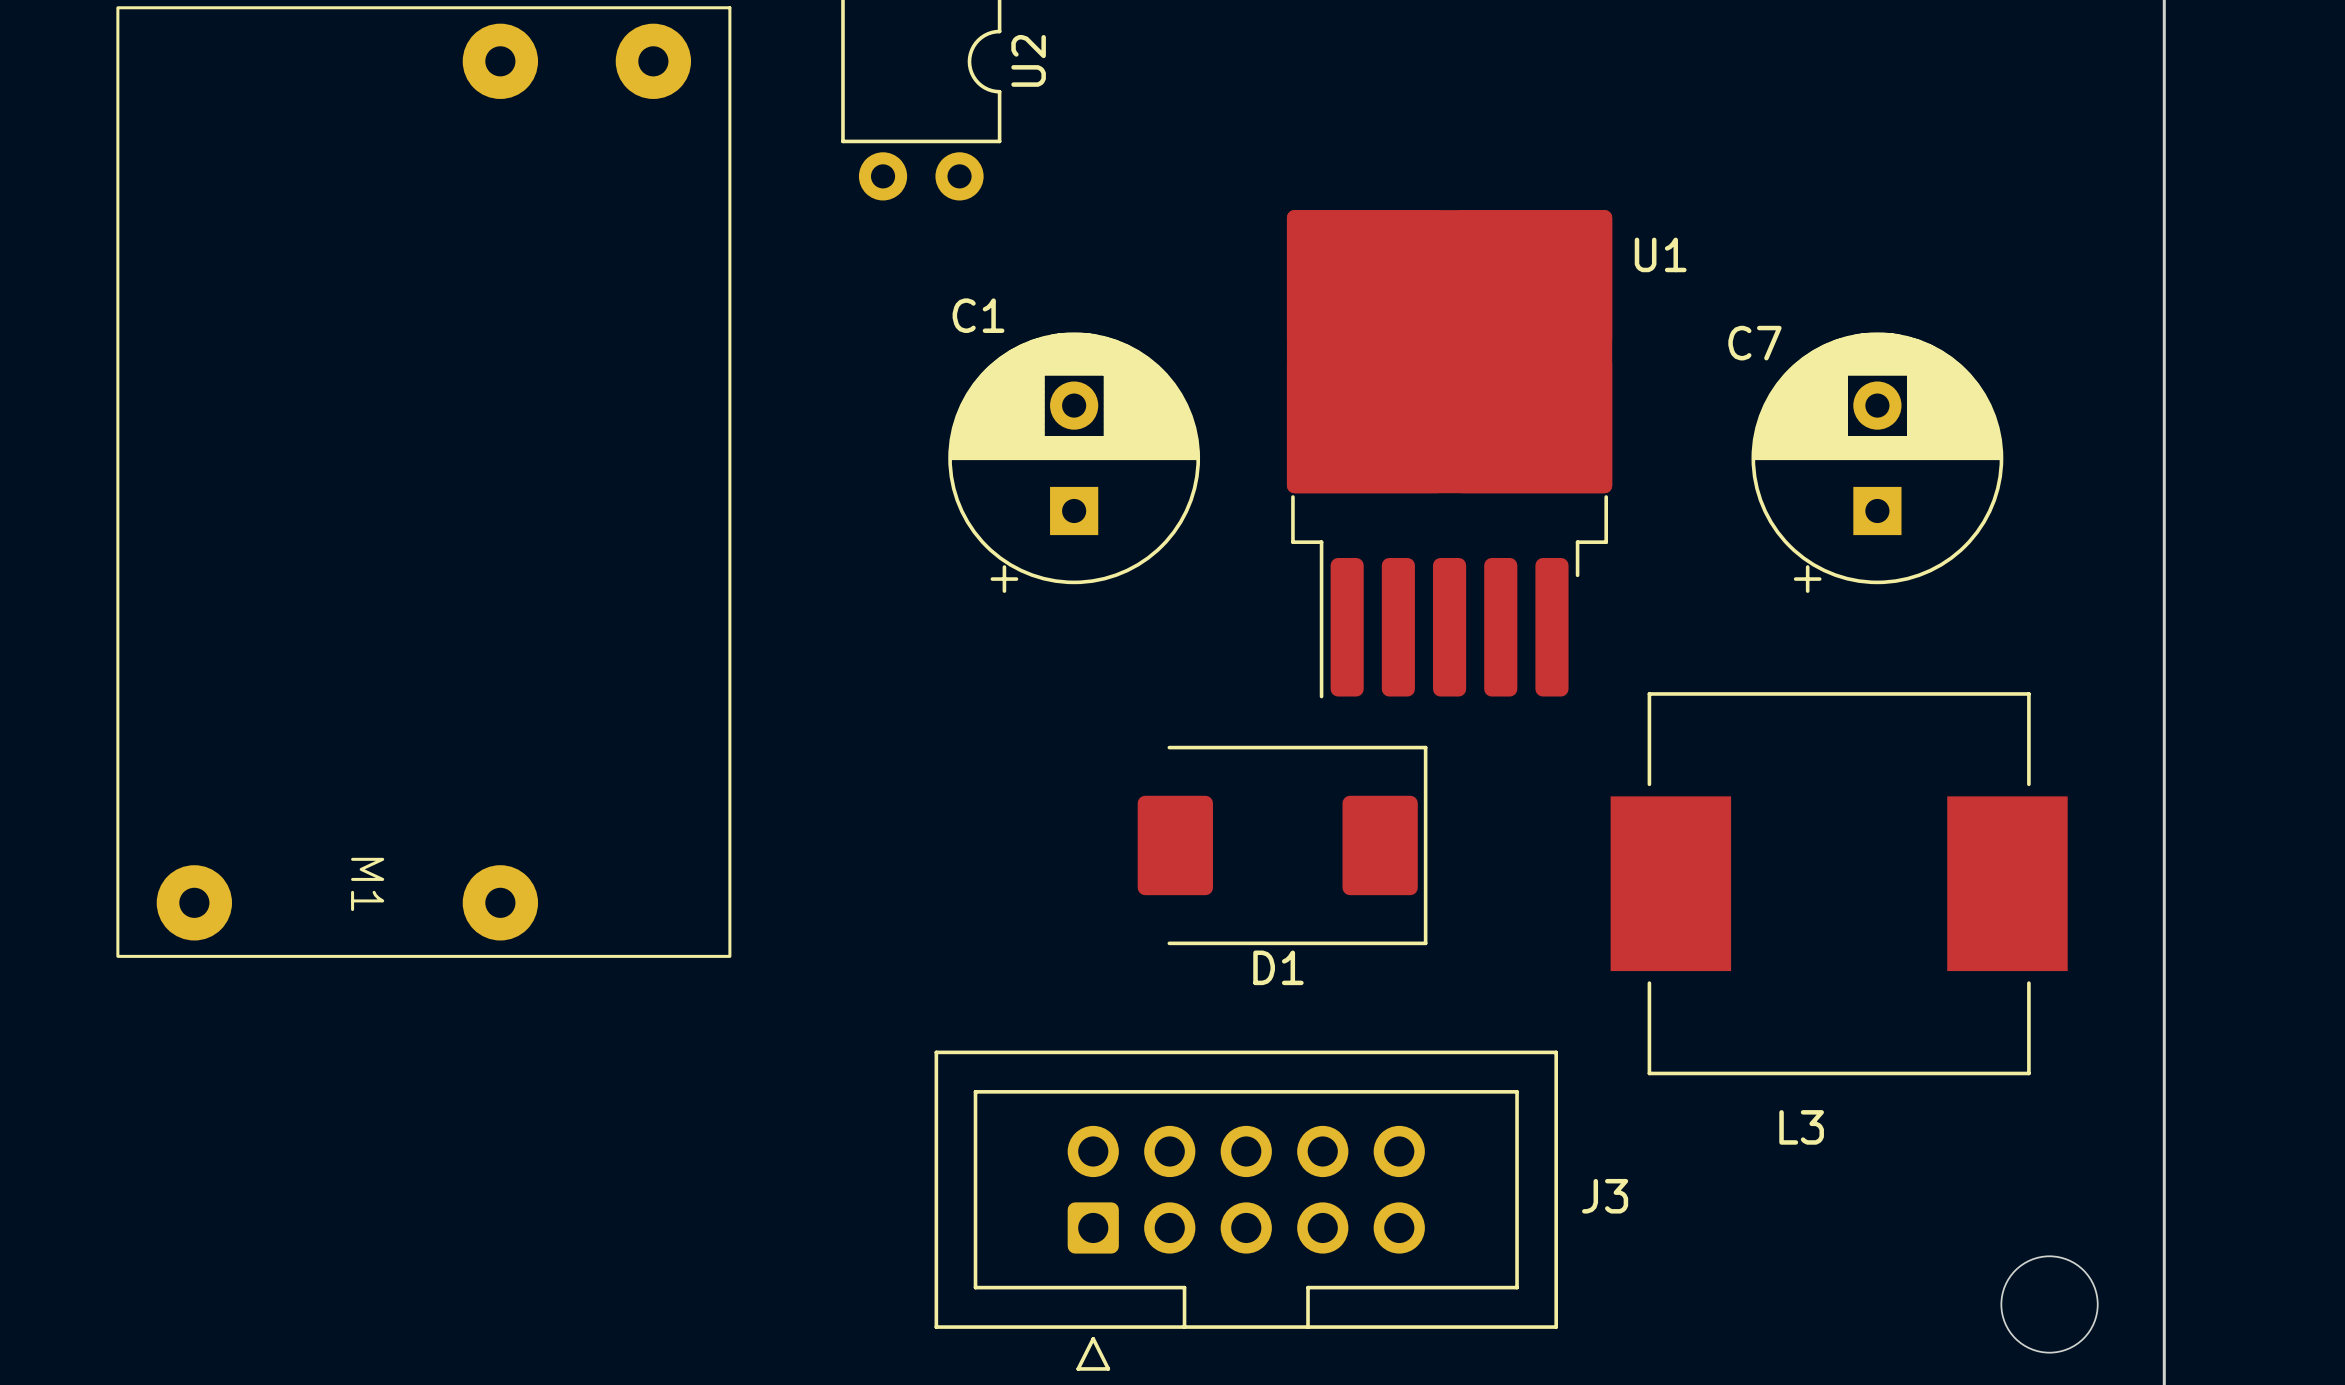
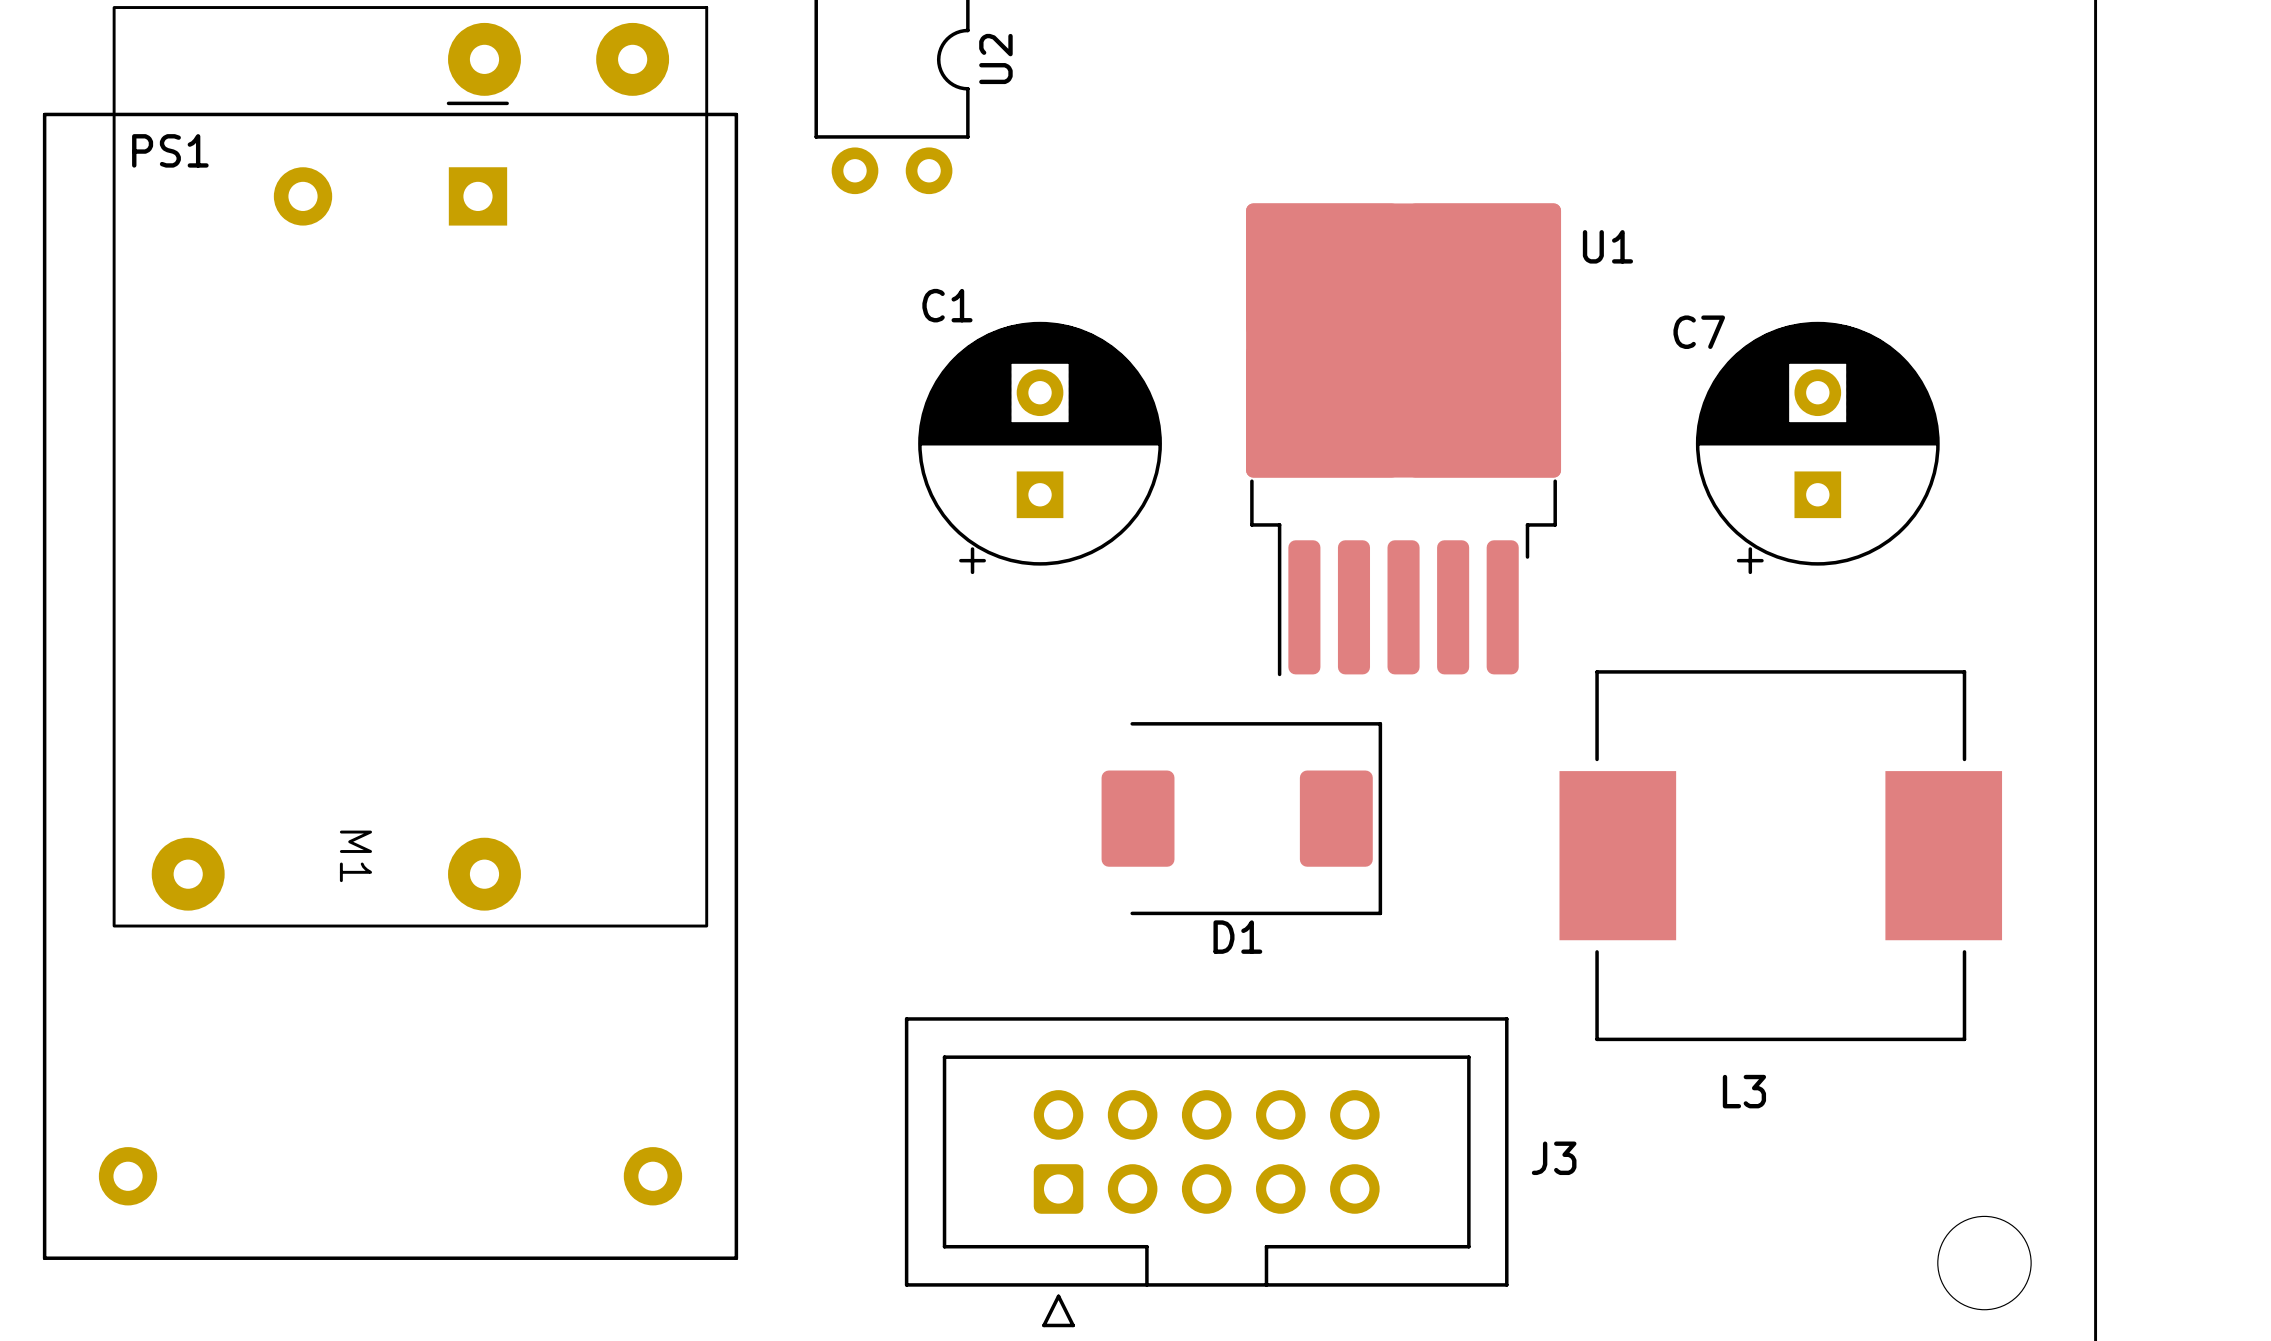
PS1: none -> (390, 680)

